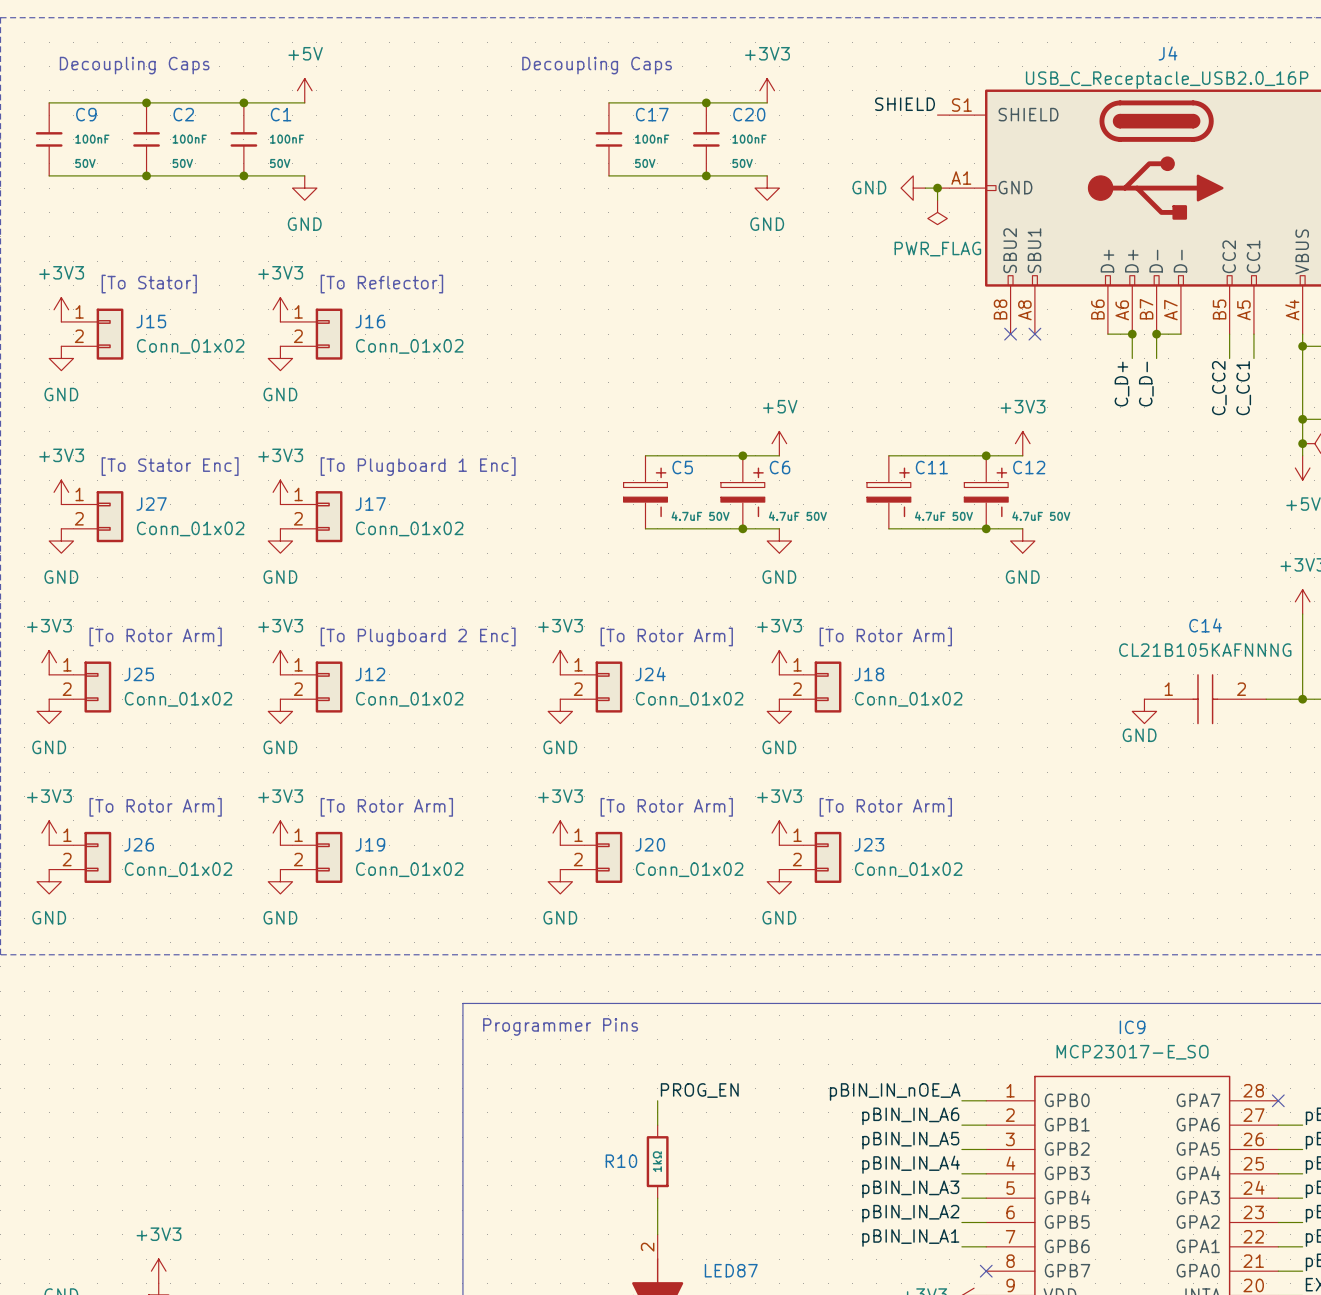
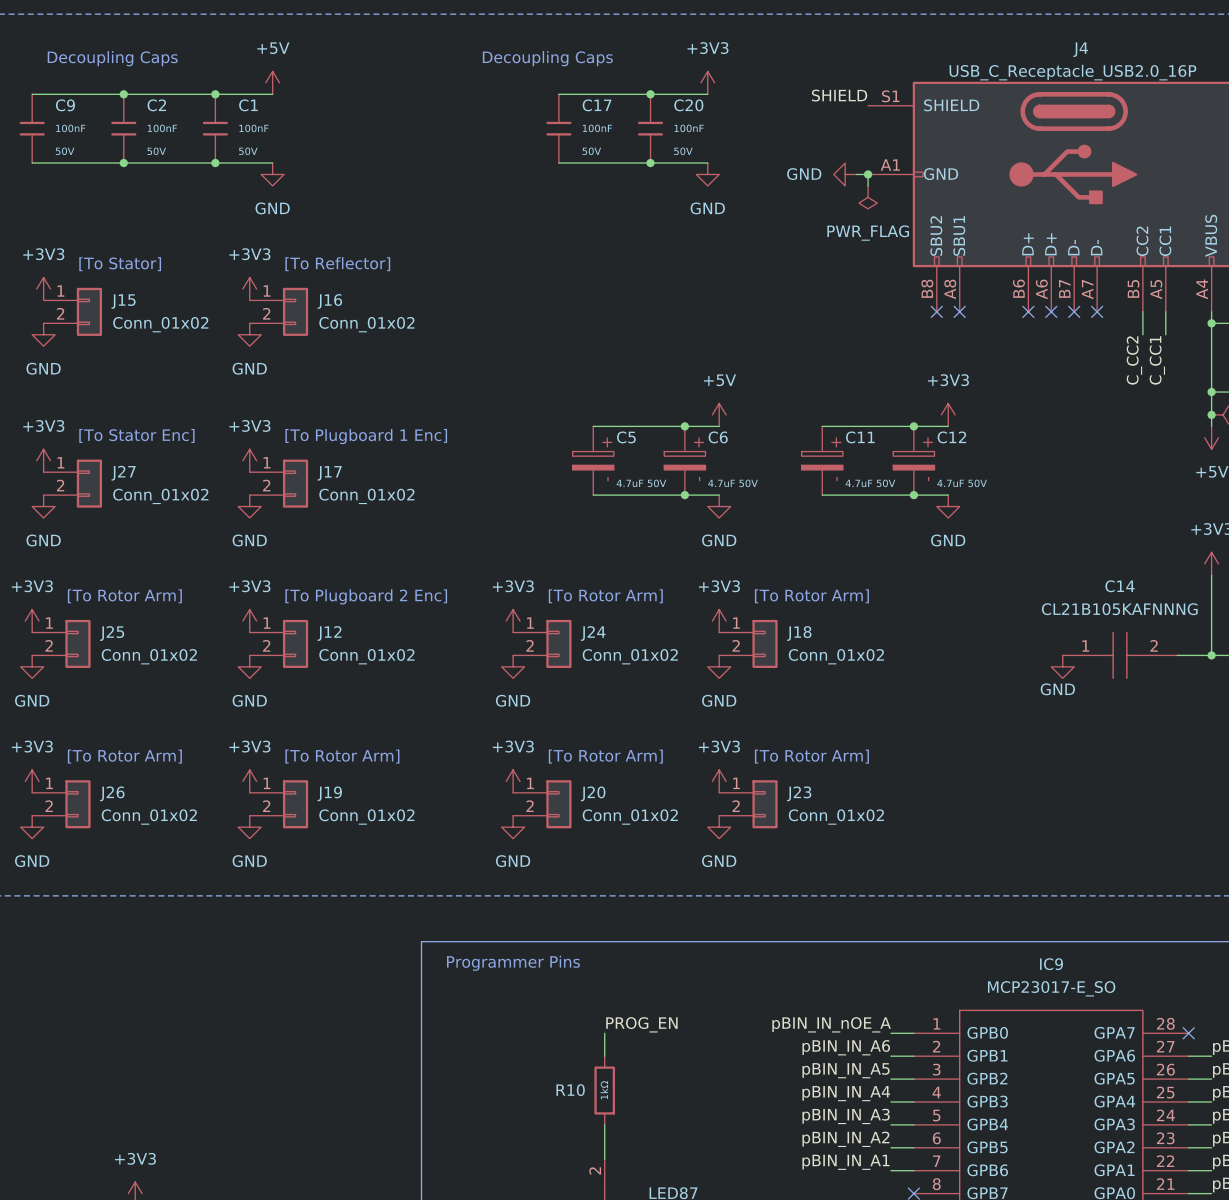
wire: (1107, 334) (1132, 334) (1132, 358) -> none
no-connect mark: none -> (1028, 311)
junction: (1132, 334) -> none
no-connect mark: none -> (1051, 311)
junction: (1156, 334) -> none
no-connect mark: none -> (1074, 311)
wire: (1180, 334) (1156, 334) (1156, 358) -> none
no-connect mark: none -> (1097, 311)
label: C_D+ (1121, 384) -> none
label: C_D- (1146, 384) -> none

